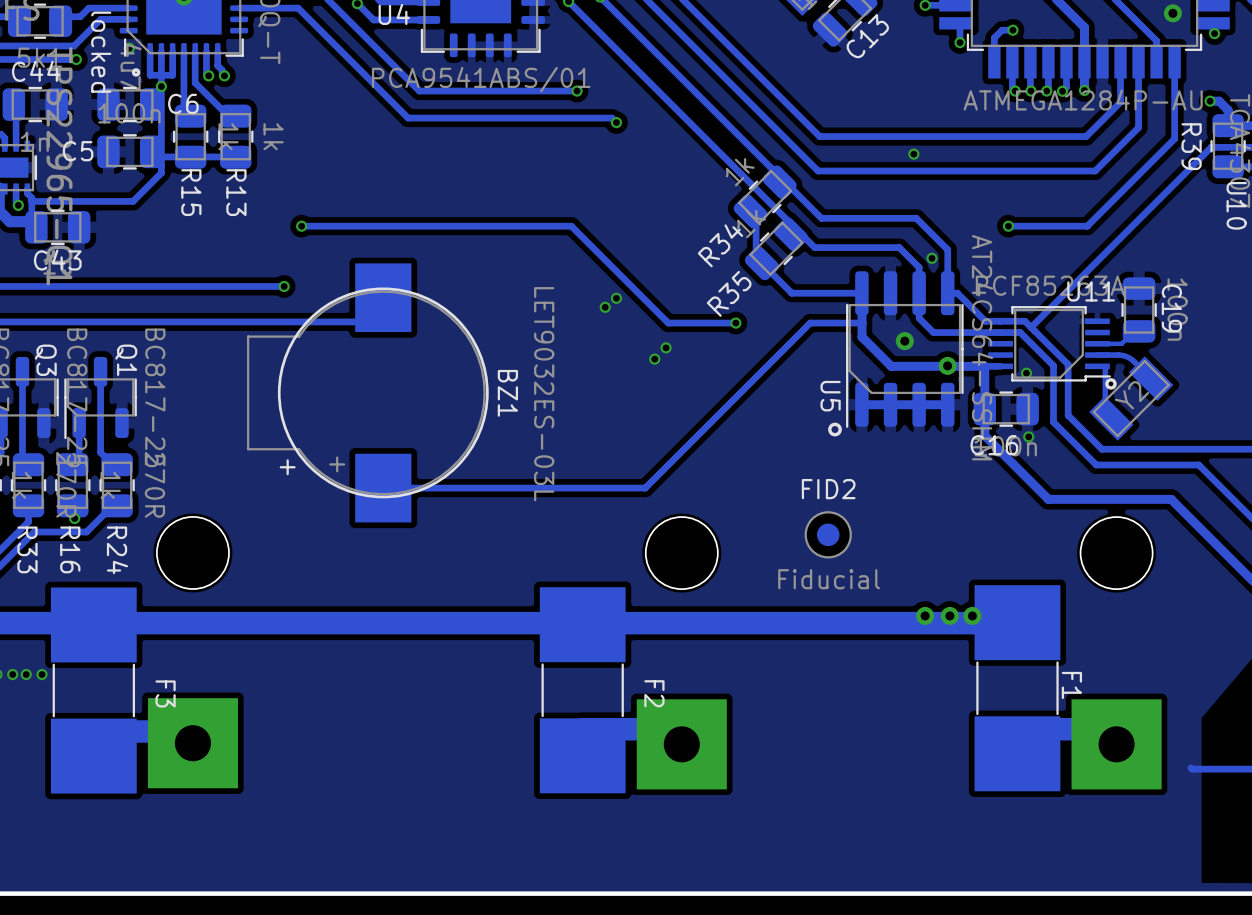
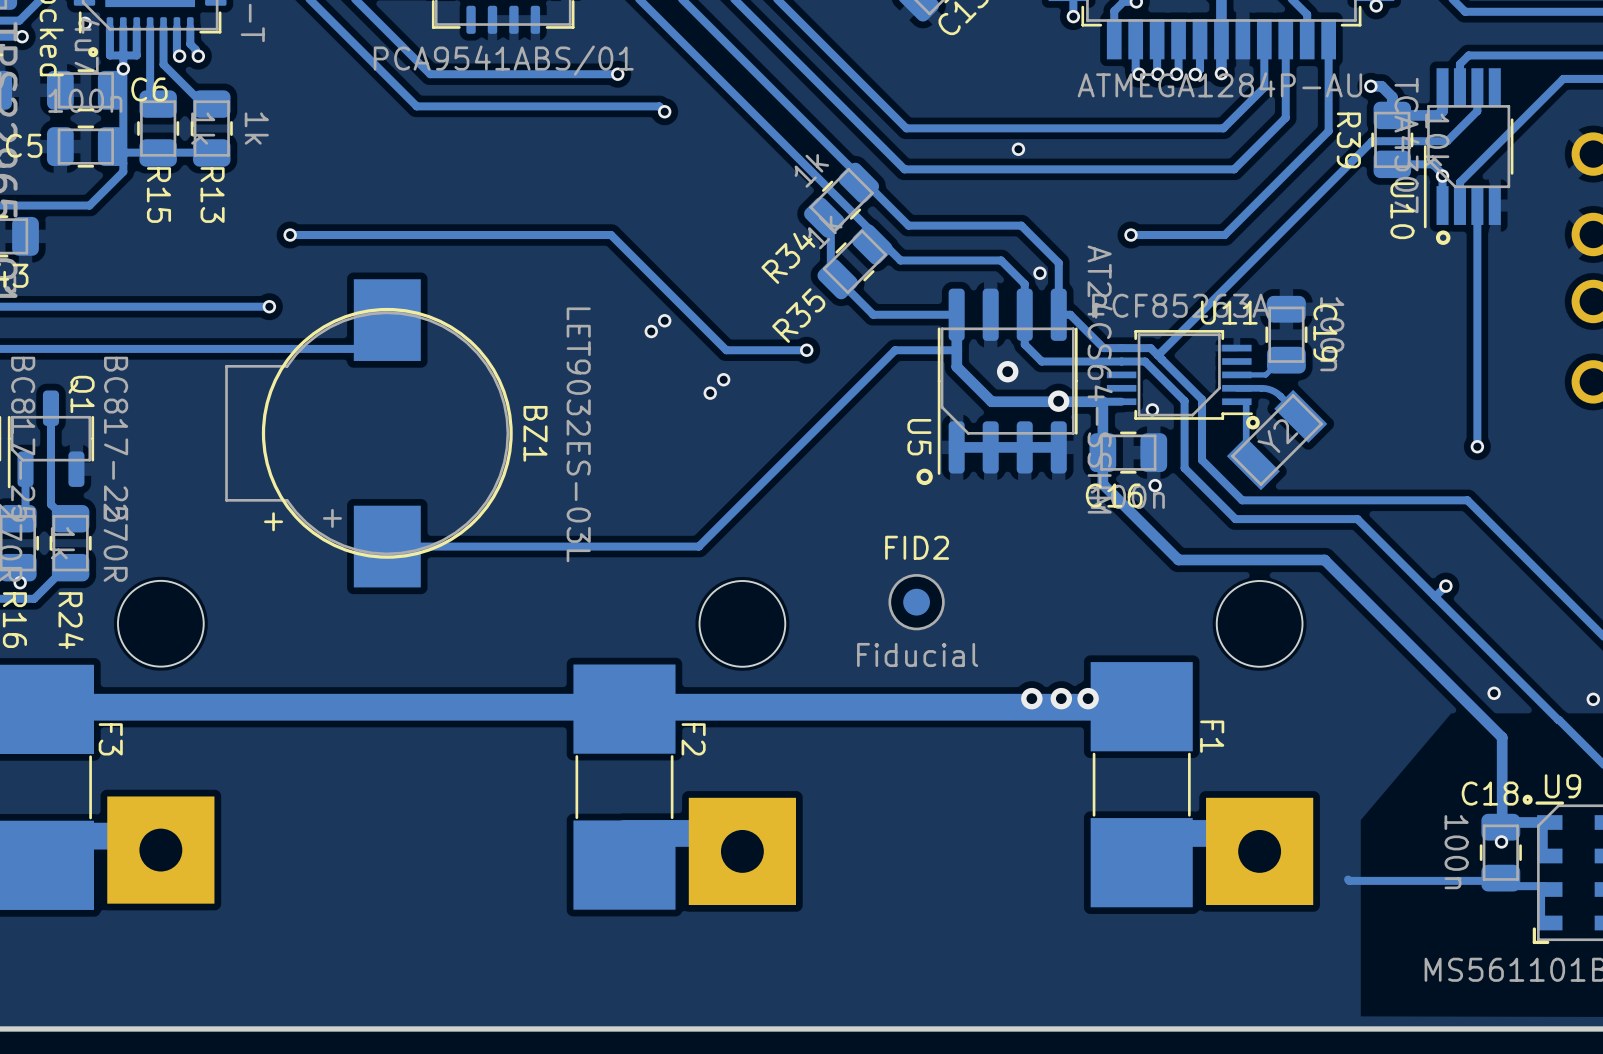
F1 name position: F1 (1071, 685) -> F1 (1212, 736)
F3 name position: F3 (165, 693) -> F3 (110, 739)
F2 name position: F2 (654, 693) -> F2 (693, 739)

